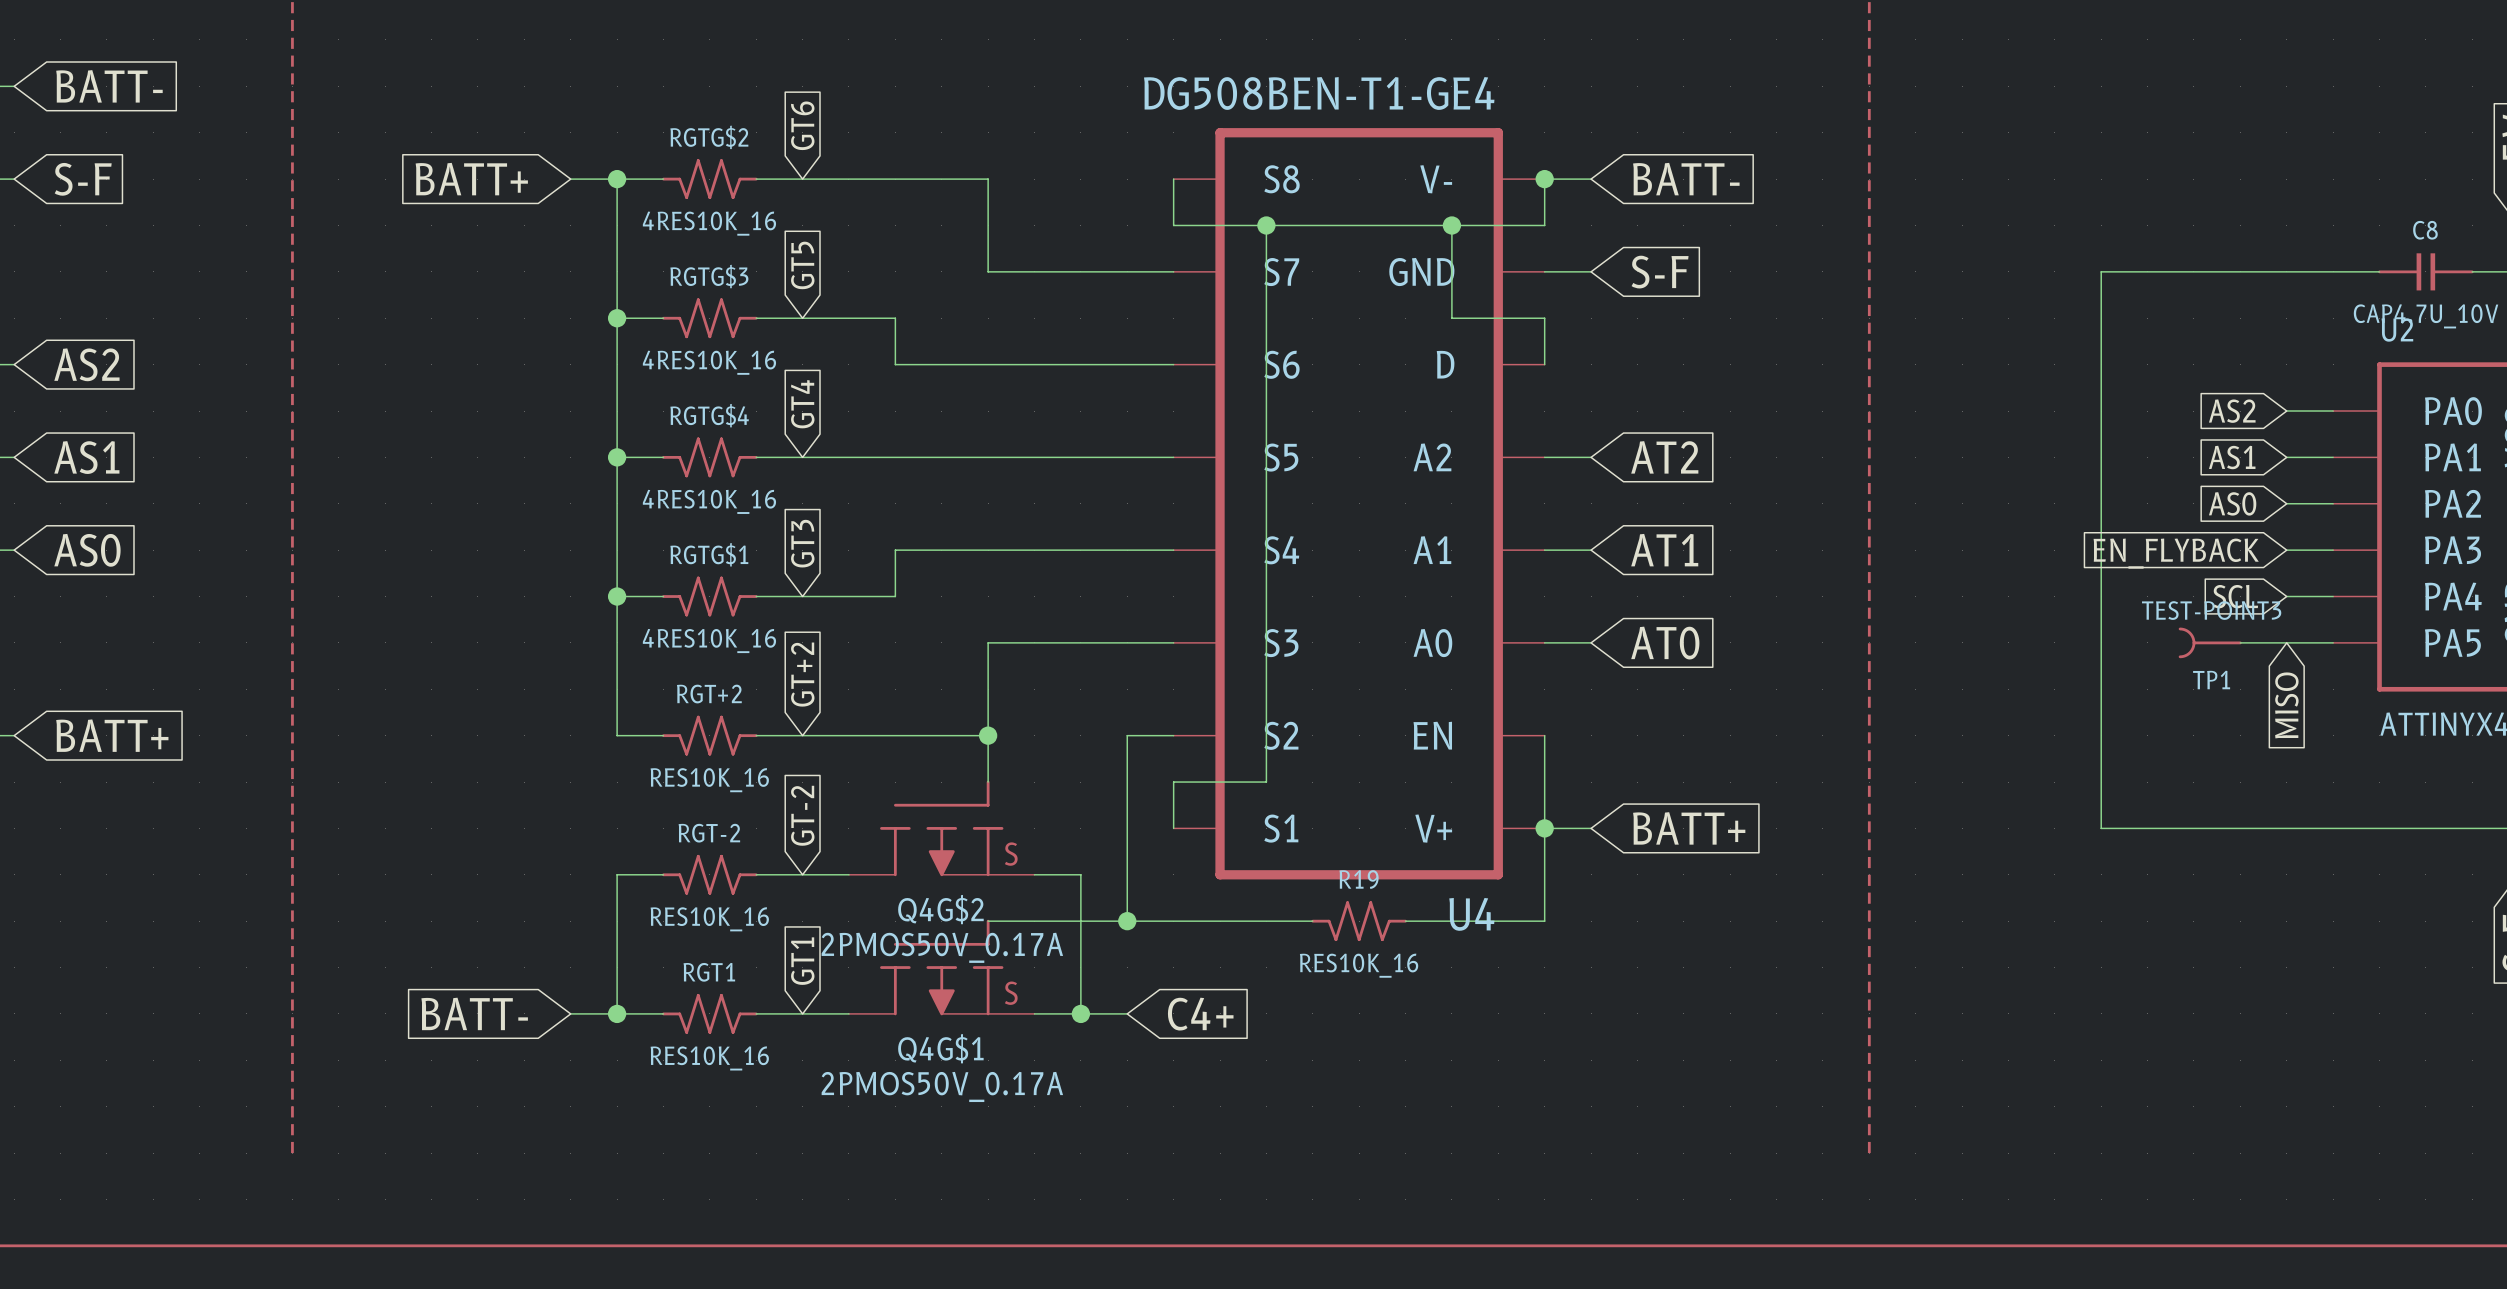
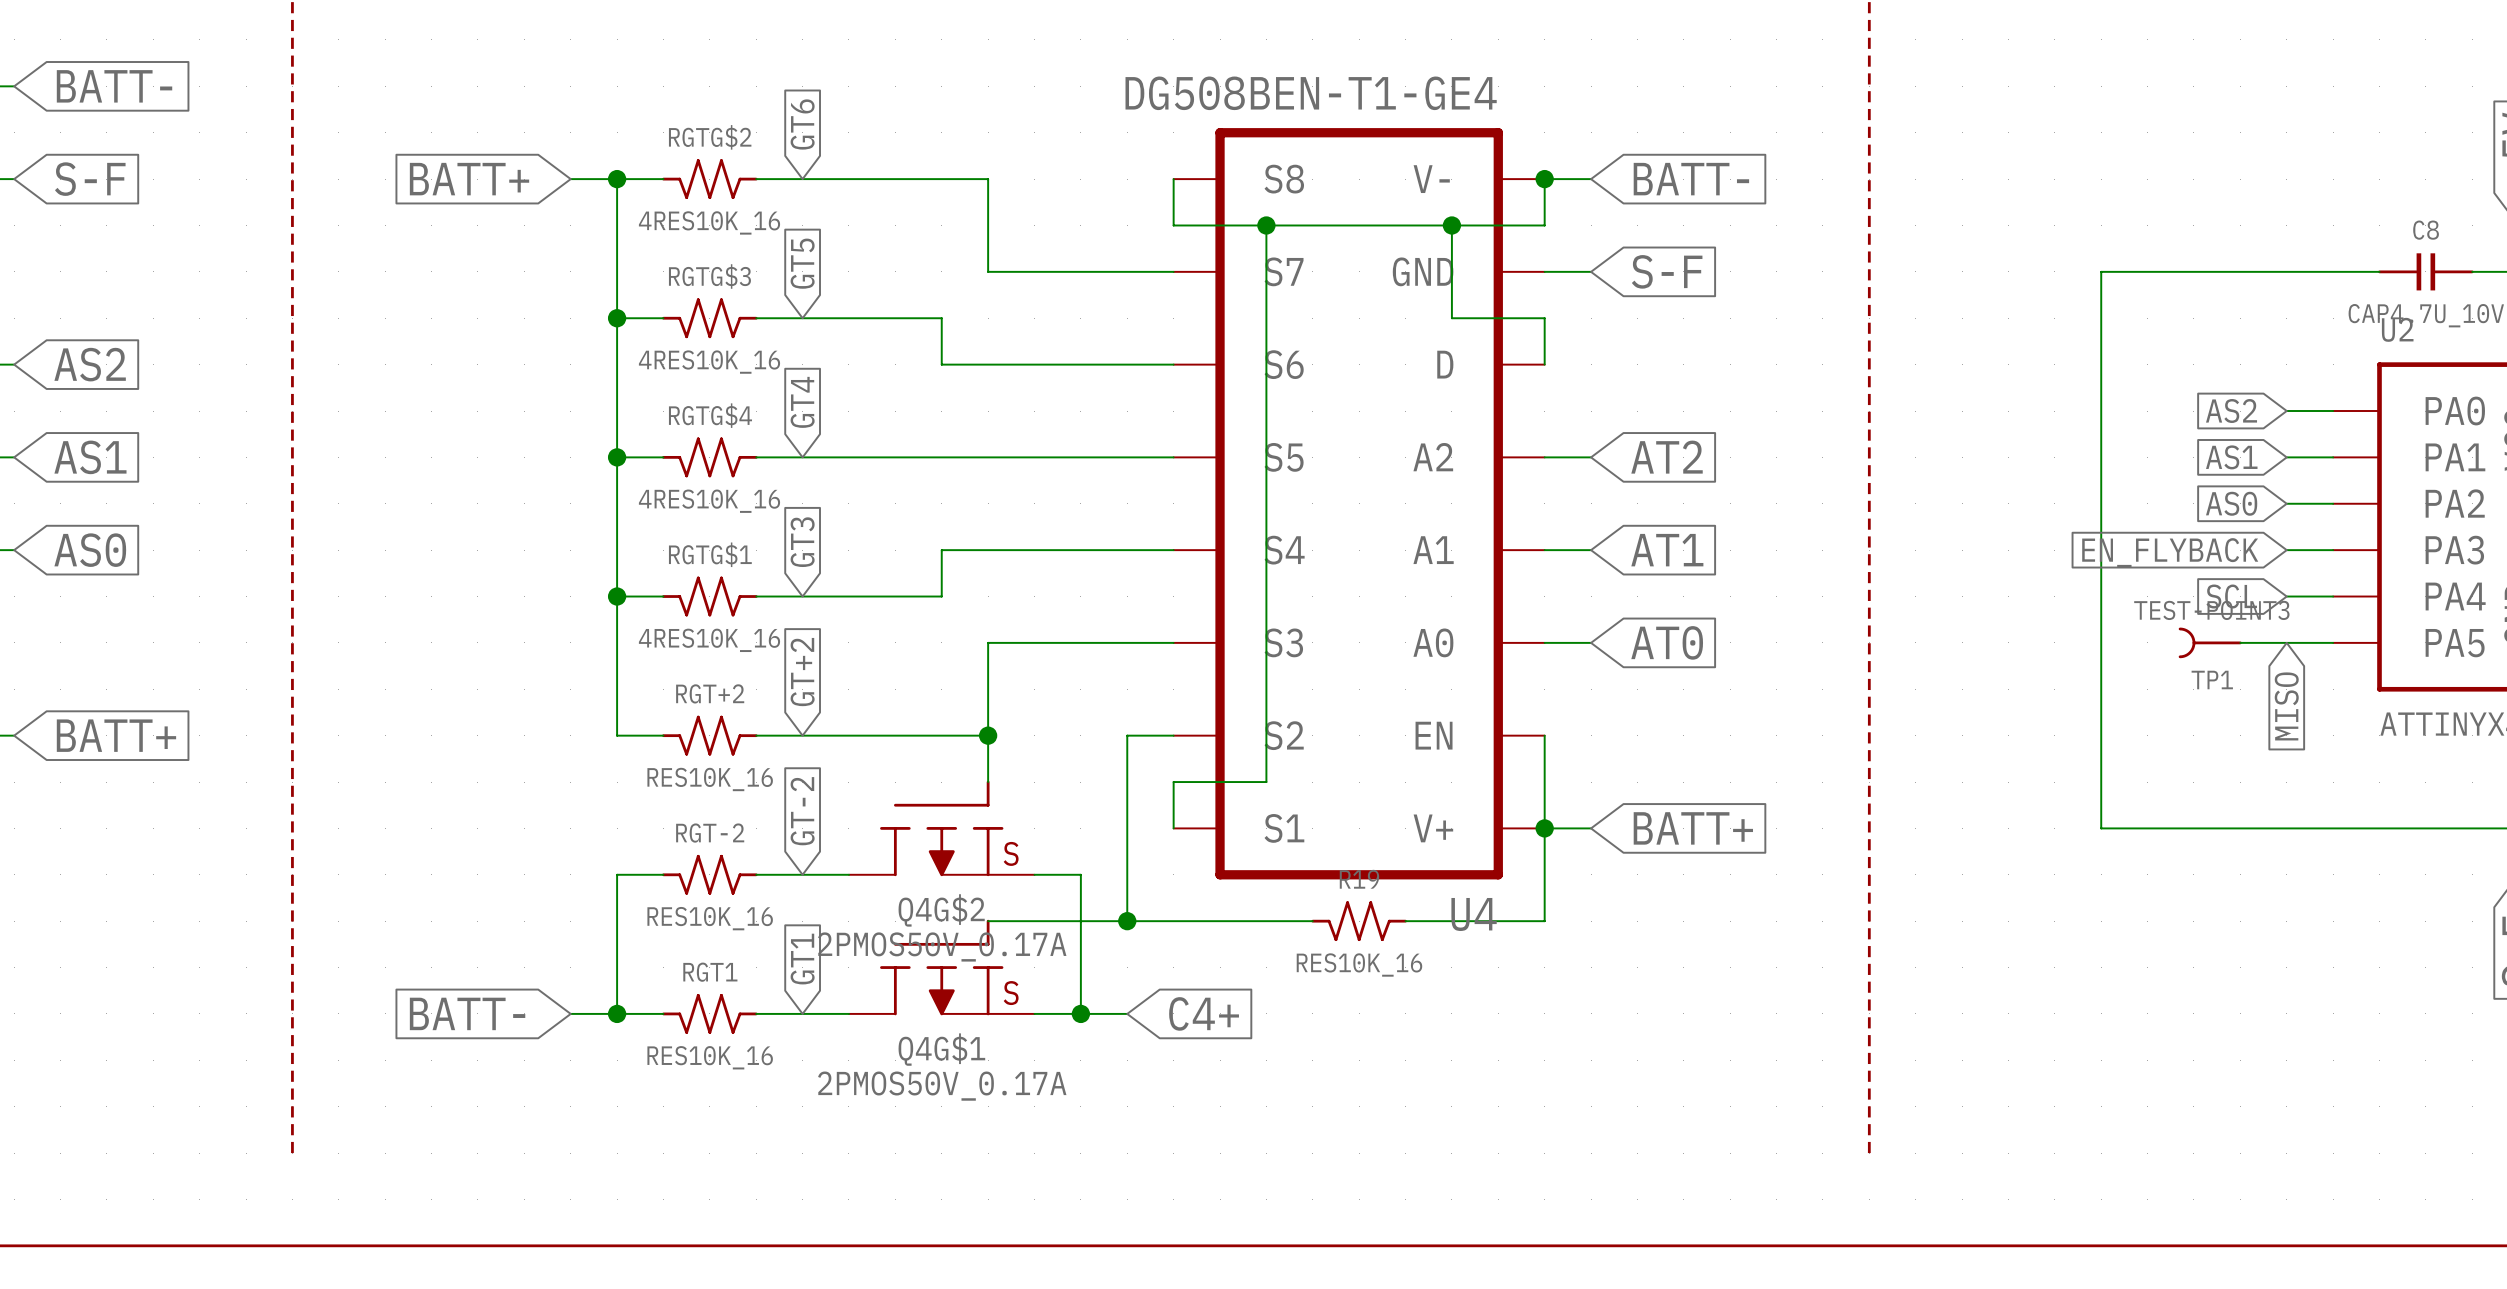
wire: (895, 318) (895, 364) (941, 364) -> (895, 318) (941, 318) (941, 364)
wire: (941, 550) (895, 550) (895, 596) -> (941, 550) (941, 596) (895, 596)

